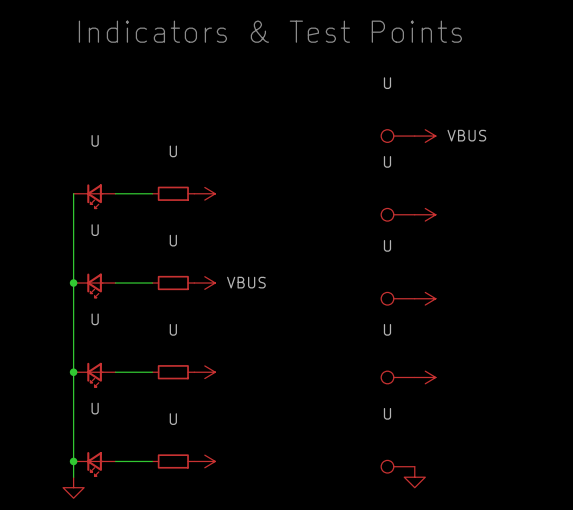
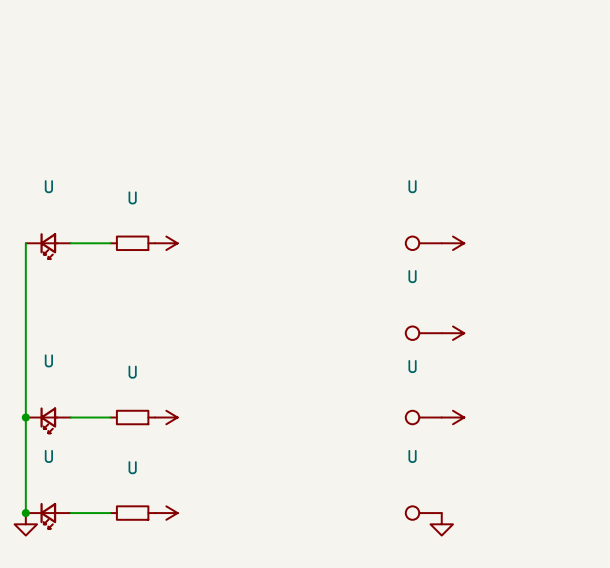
text: Indicators & Test Points (270, 31) -> none
U: (397, 136) -> none
power symbol: VBUS (425, 136) -> none
wire: (73, 193) (73, 477) -> none
wire: (115, 193) (152, 193) -> (70, 243) (110, 243)
U: (173, 193) -> none
power symbol position: (204, 193) -> (166, 243)
U: (94, 196) -> none
wire: none -> (25, 243) (25, 513)
U: none -> (132, 243)
U: none -> (48, 246)
junction: (73, 283) -> none
wire: (115, 283) (152, 283) -> none
U: (173, 283) -> none
power symbol: VBUS (204, 283) -> none
U: (94, 285) -> none
junction position: (73, 372) -> (25, 417)
wire: (115, 372) (152, 372) -> (70, 417) (110, 417)
U position: (173, 372) -> (132, 417)
power symbol position: (204, 372) -> (166, 417)
U position: (94, 374) -> (48, 420)
junction position: (73, 461) -> (25, 513)
wire: (115, 461) (152, 461) -> (70, 513) (110, 513)
U position: (173, 461) -> (132, 513)
power symbol position: (204, 461) -> (166, 513)
U position: (94, 464) -> (48, 515)
power symbol position: (73, 487) -> (25, 524)

